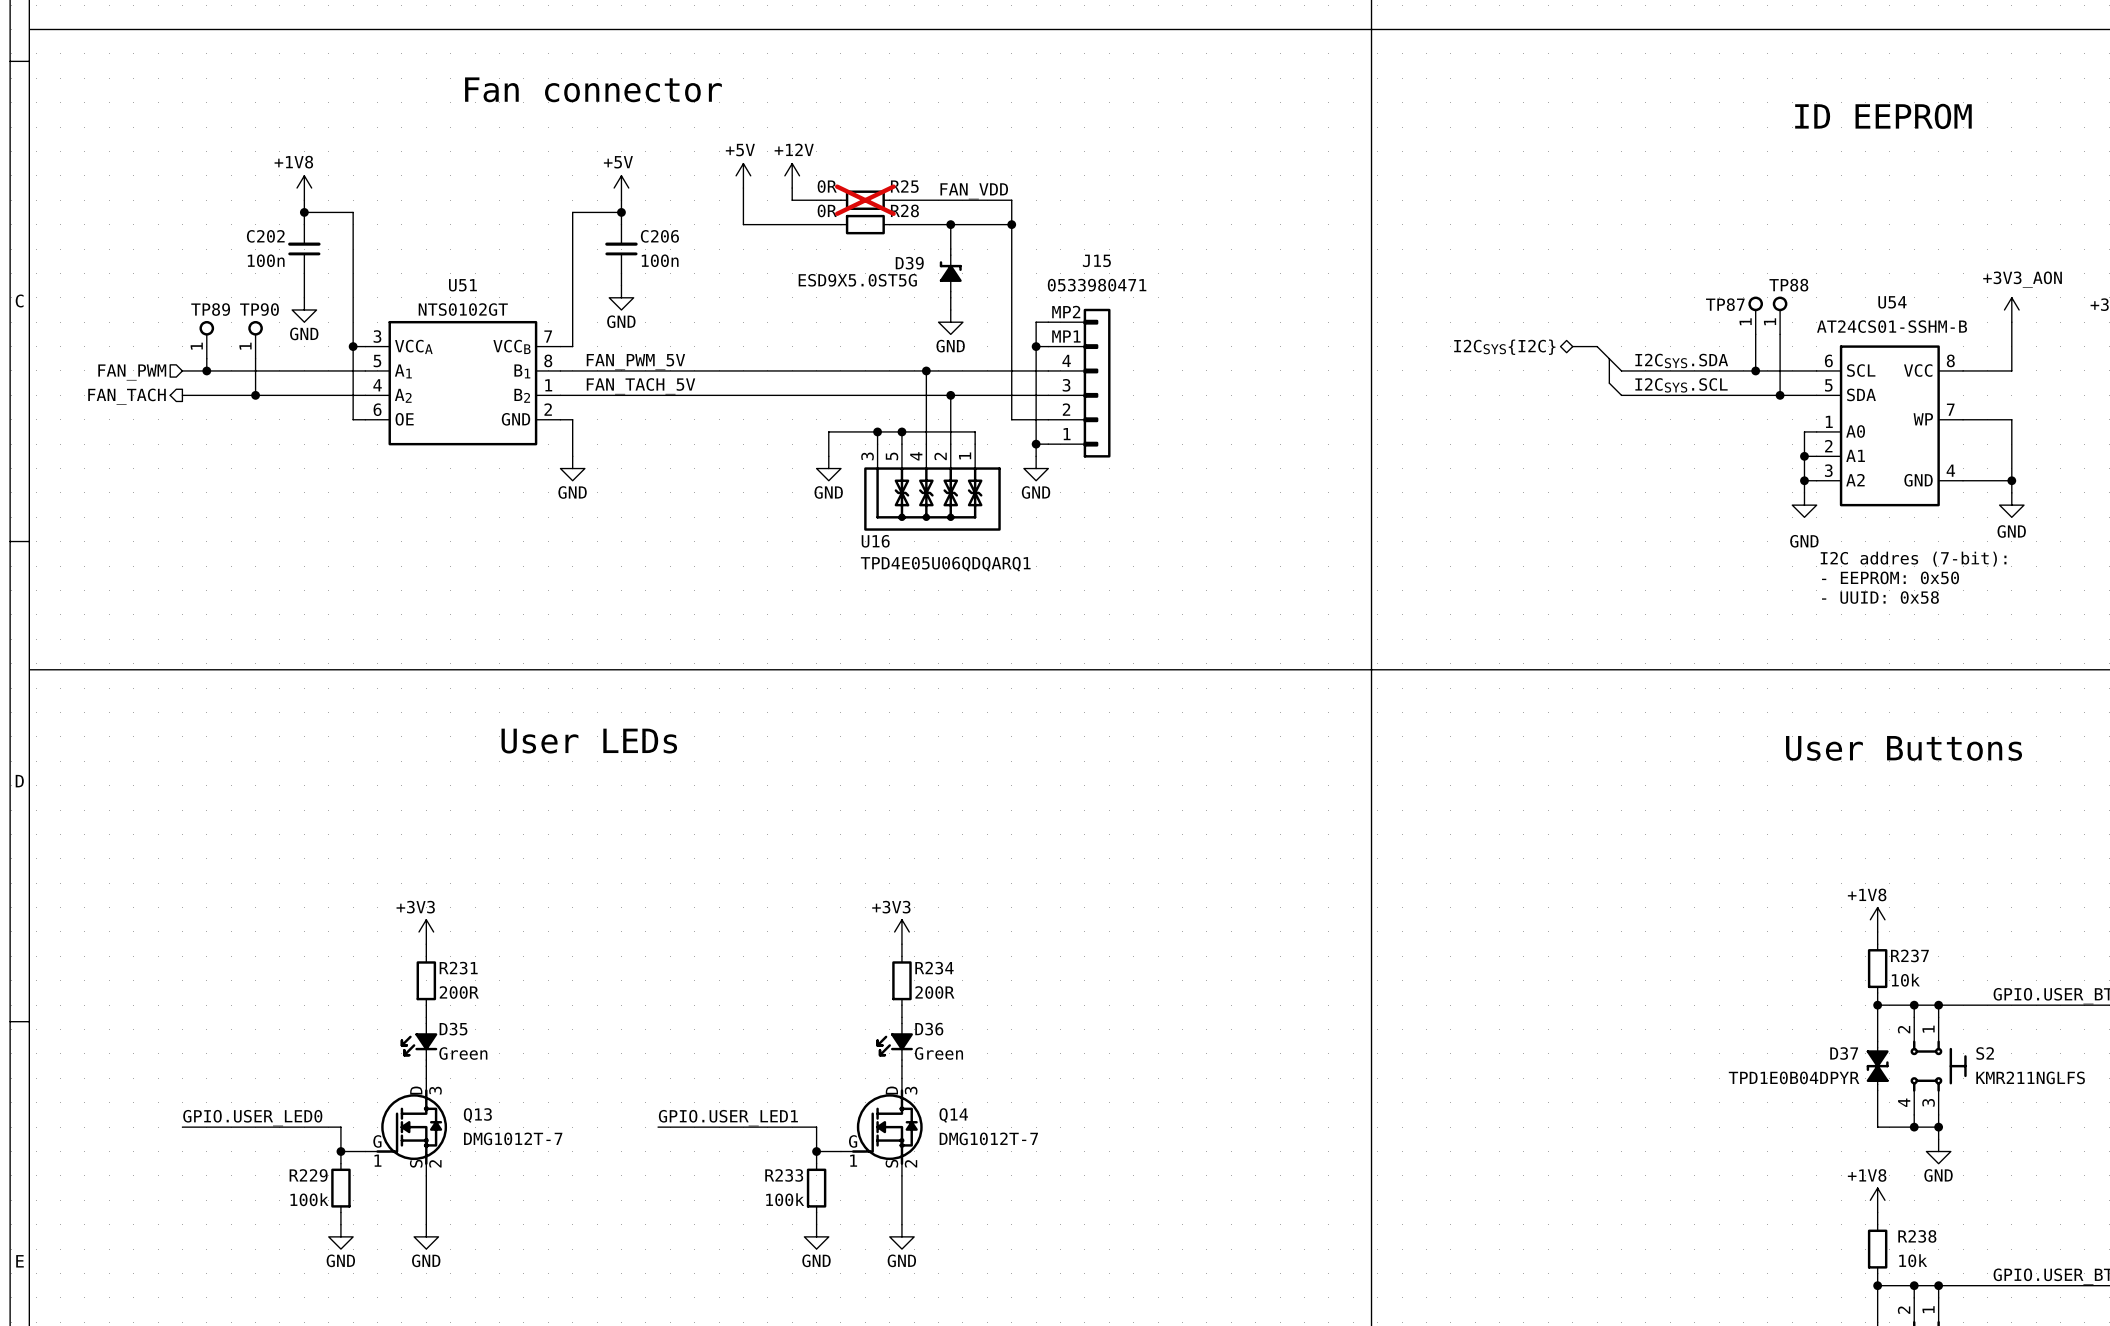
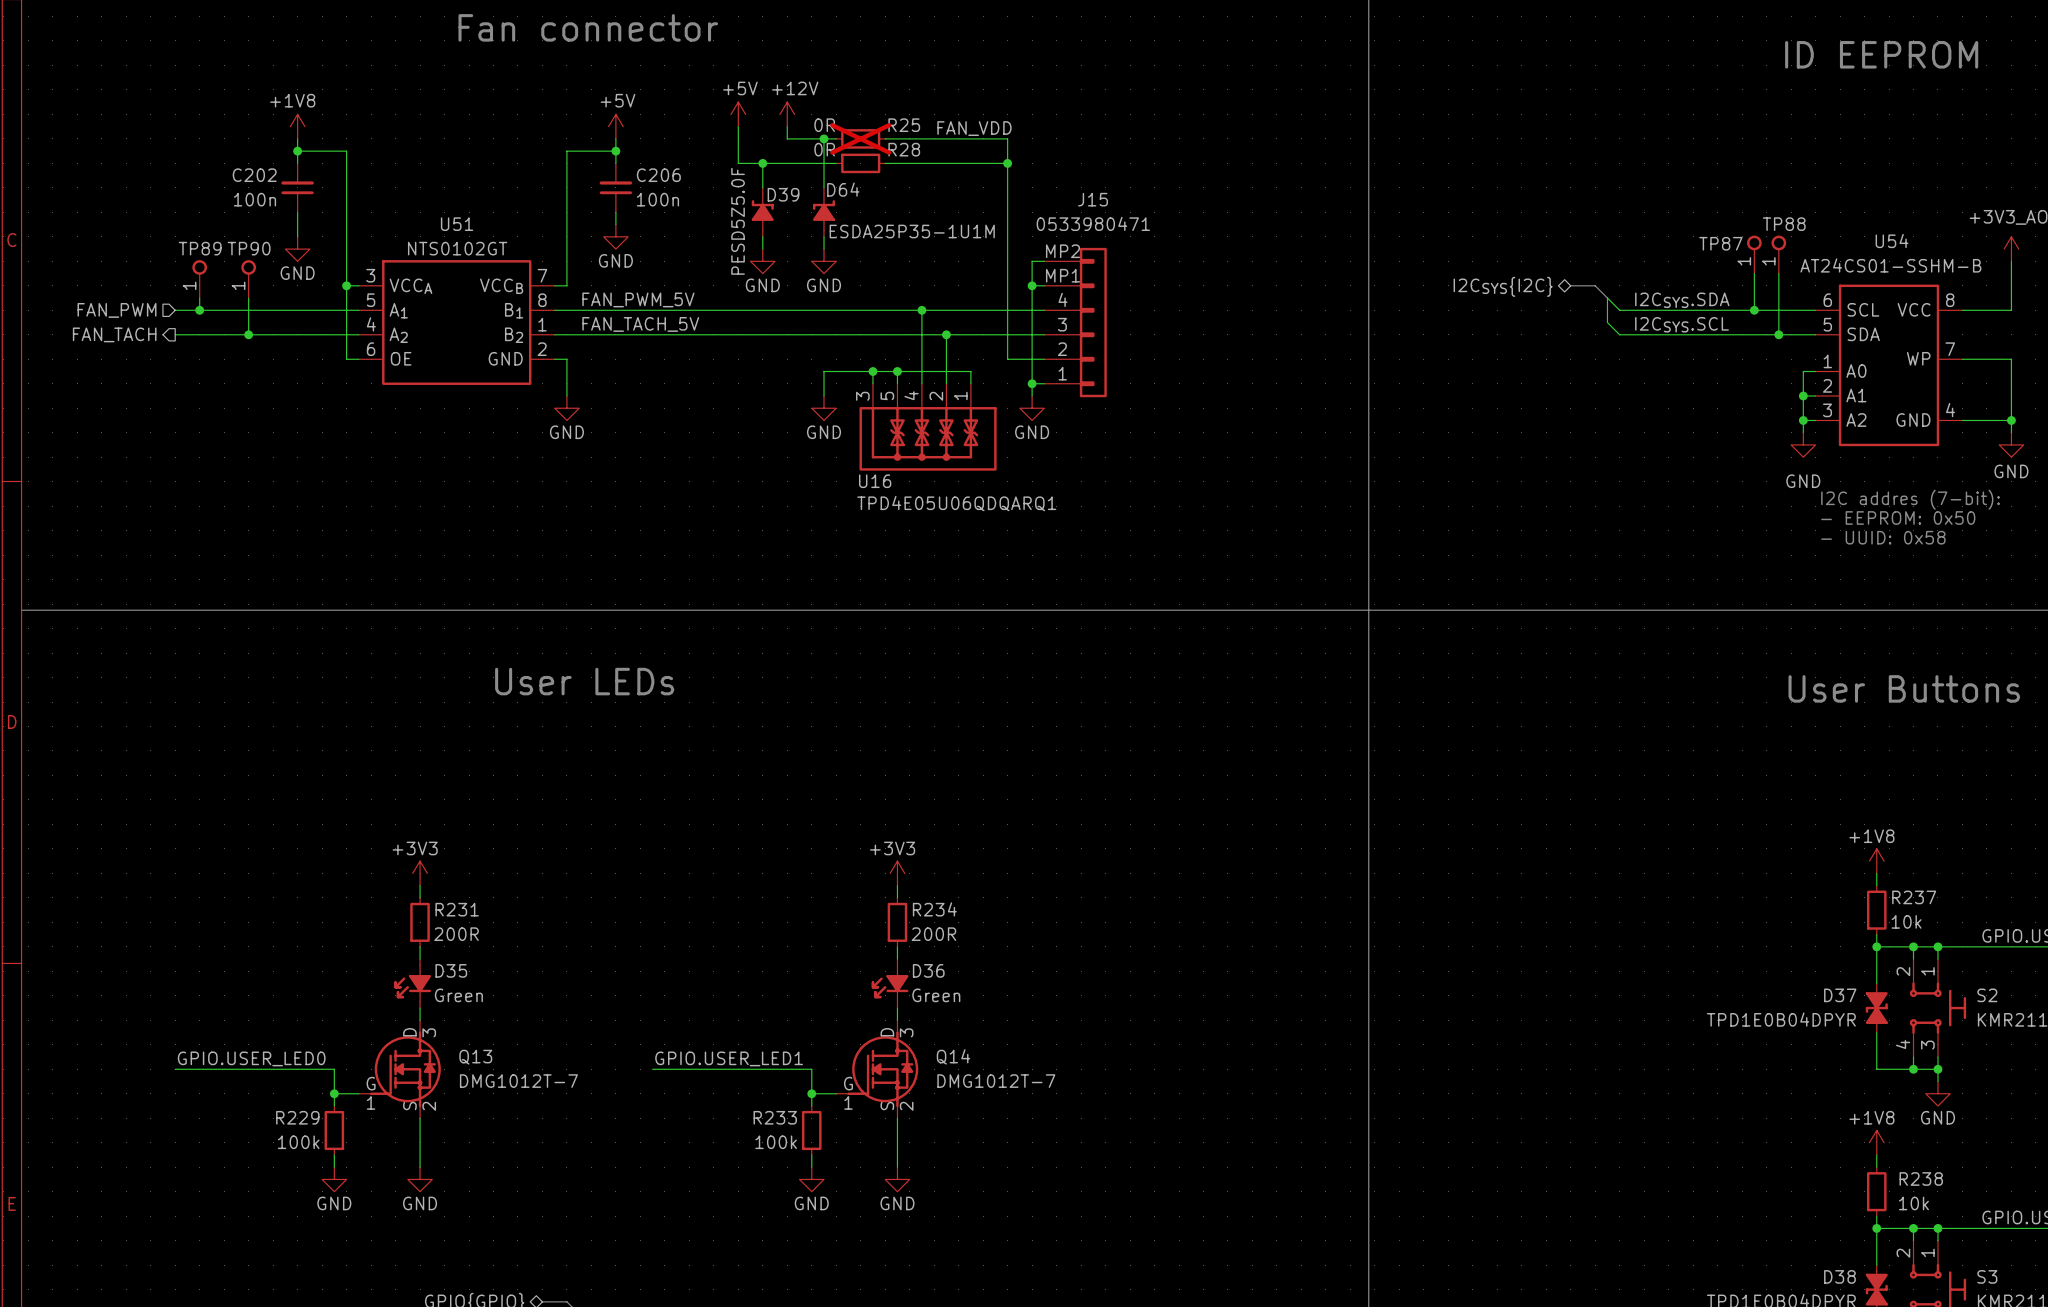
wire: none -> (824, 138) (824, 187)
junction: none -> (824, 138)
junction: none -> (762, 163)
wire: (950, 224) (950, 249) -> (762, 163) (762, 187)
junction: (950, 224) -> none
D39 name position: D39 (909, 263) -> D39 (783, 194)
D64: none -> (824, 212)
D39 position: (950, 273) -> (762, 212)
D39 text: ESD9X5.0ST5G (857, 280) -> PESD5Z5.0F (738, 221)
wire: none -> (824, 236) (824, 249)
wire: (950, 297) (950, 309) -> (762, 236) (762, 249)
power symbol: none -> GND (762, 261)
power symbol: none -> GND (824, 261)
power symbol: GND (950, 322) -> none

